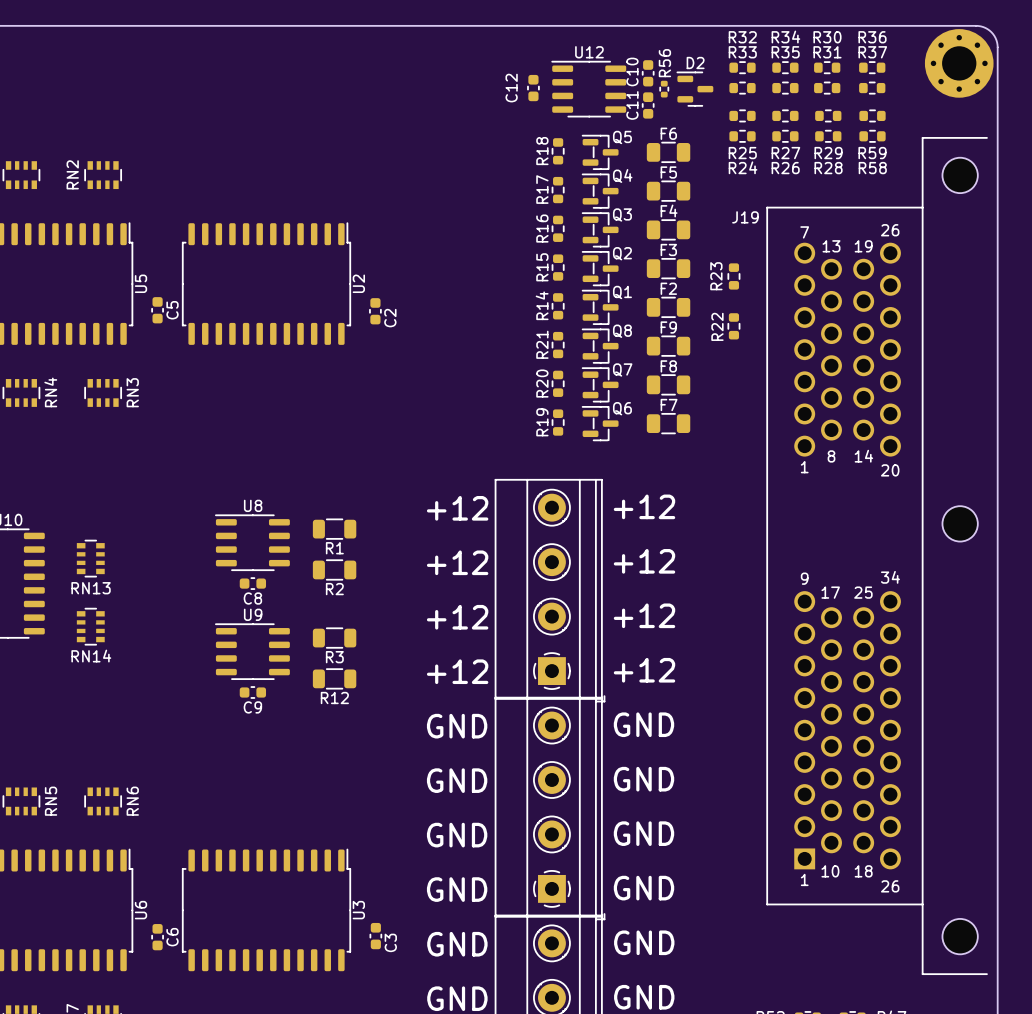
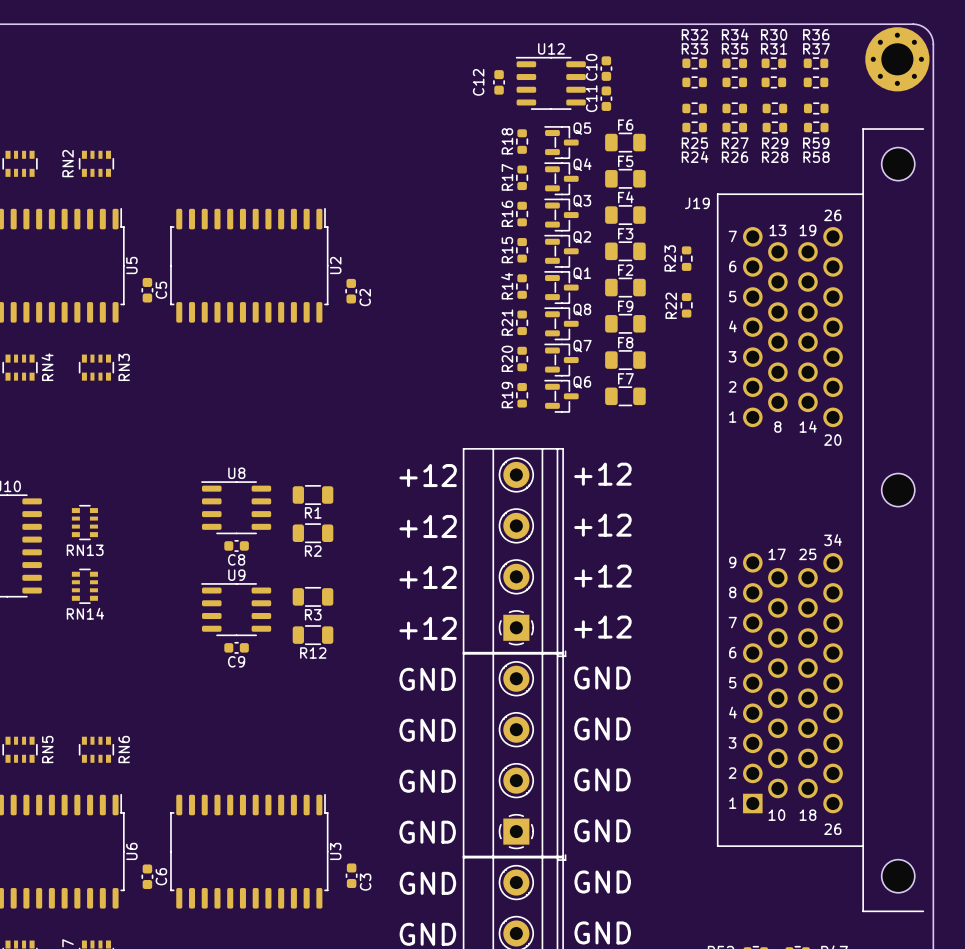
R56: (664, 89) -> none
D2: (695, 89) -> none
J19 footprint: [766, 137, 988, 975] -> [717, 128, 924, 912]

